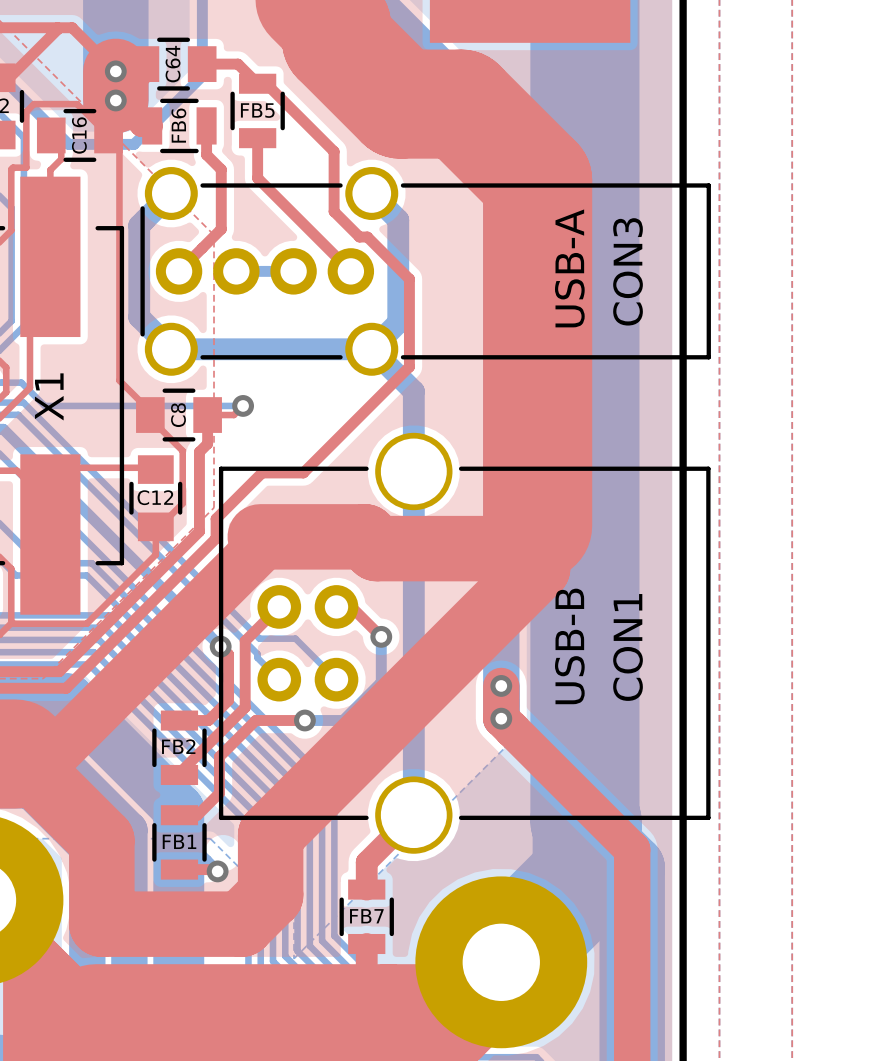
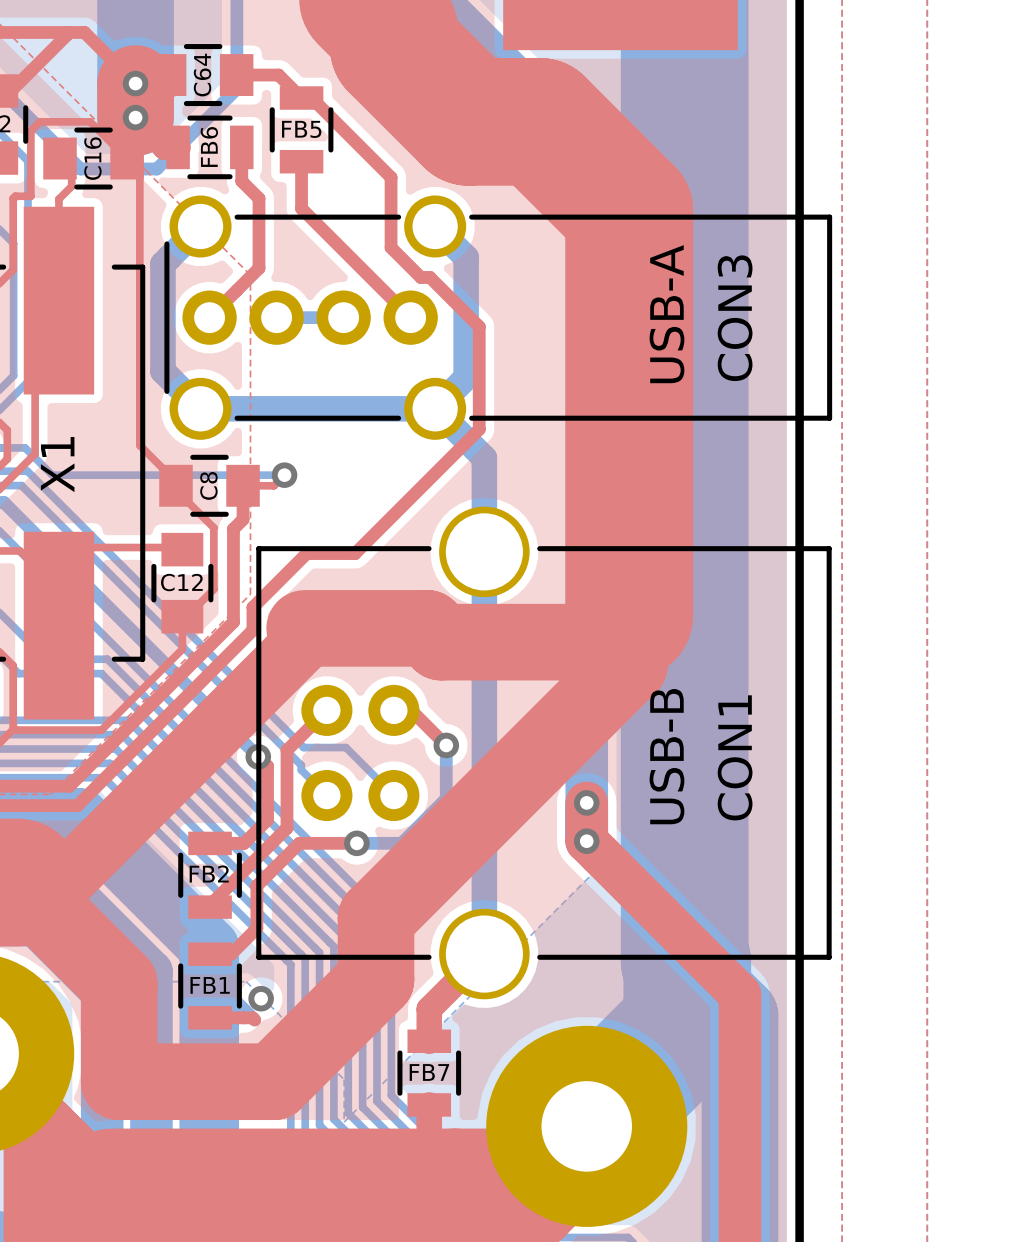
top track: (321, 784) (270, 835) (270, 895) (241, 924) (234, 924) -> (376, 918) (376, 979) (273, 1081)
via position: (217, 871) -> (261, 998)

